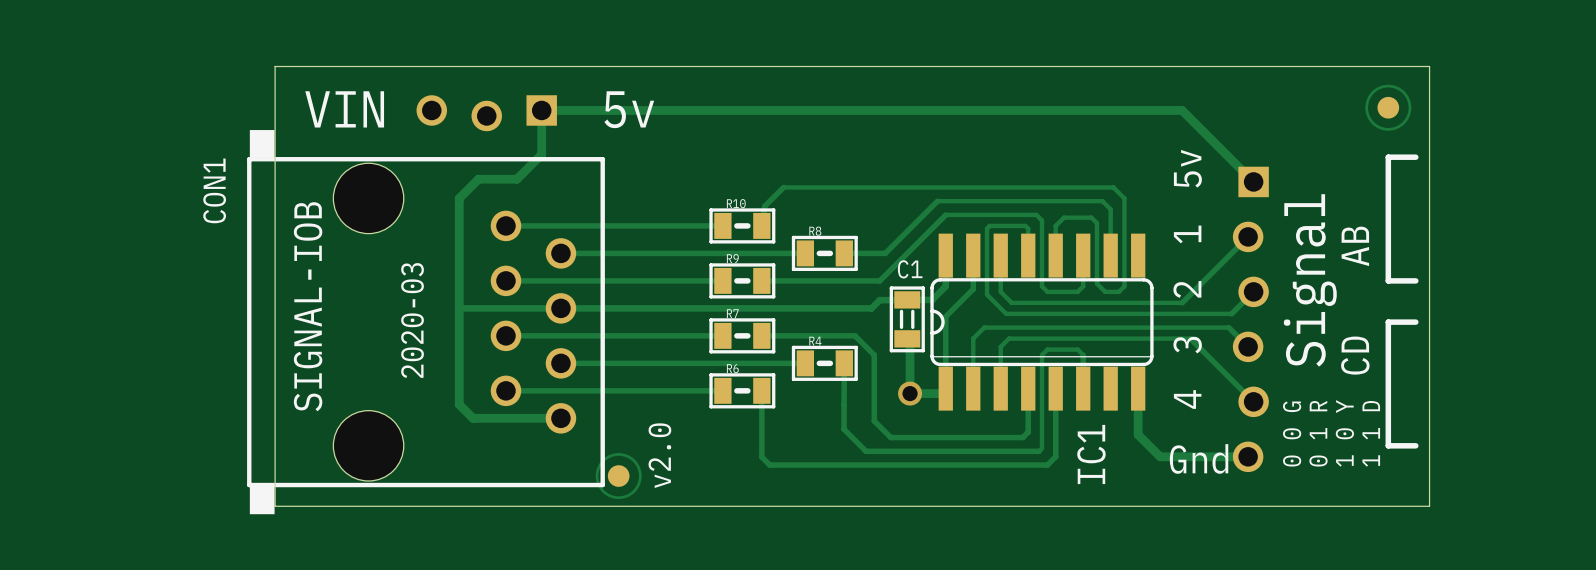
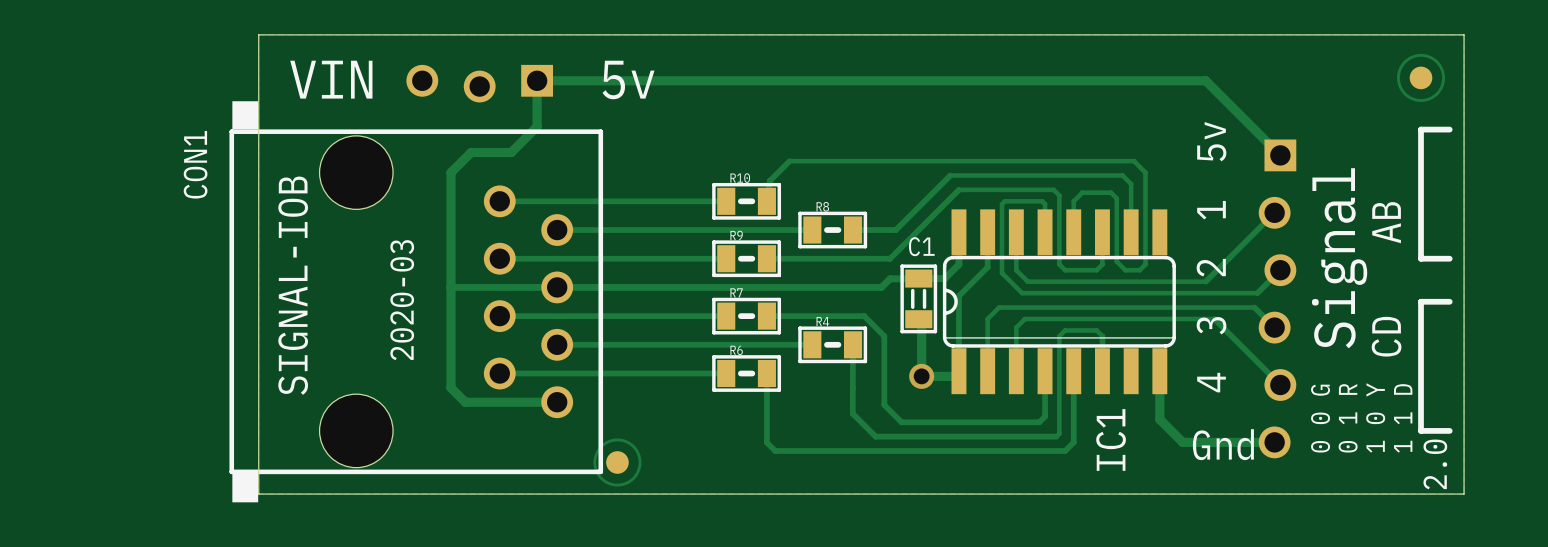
text: v2.0 (659, 455) -> none
text: none -> 2.0 (1435, 464)

